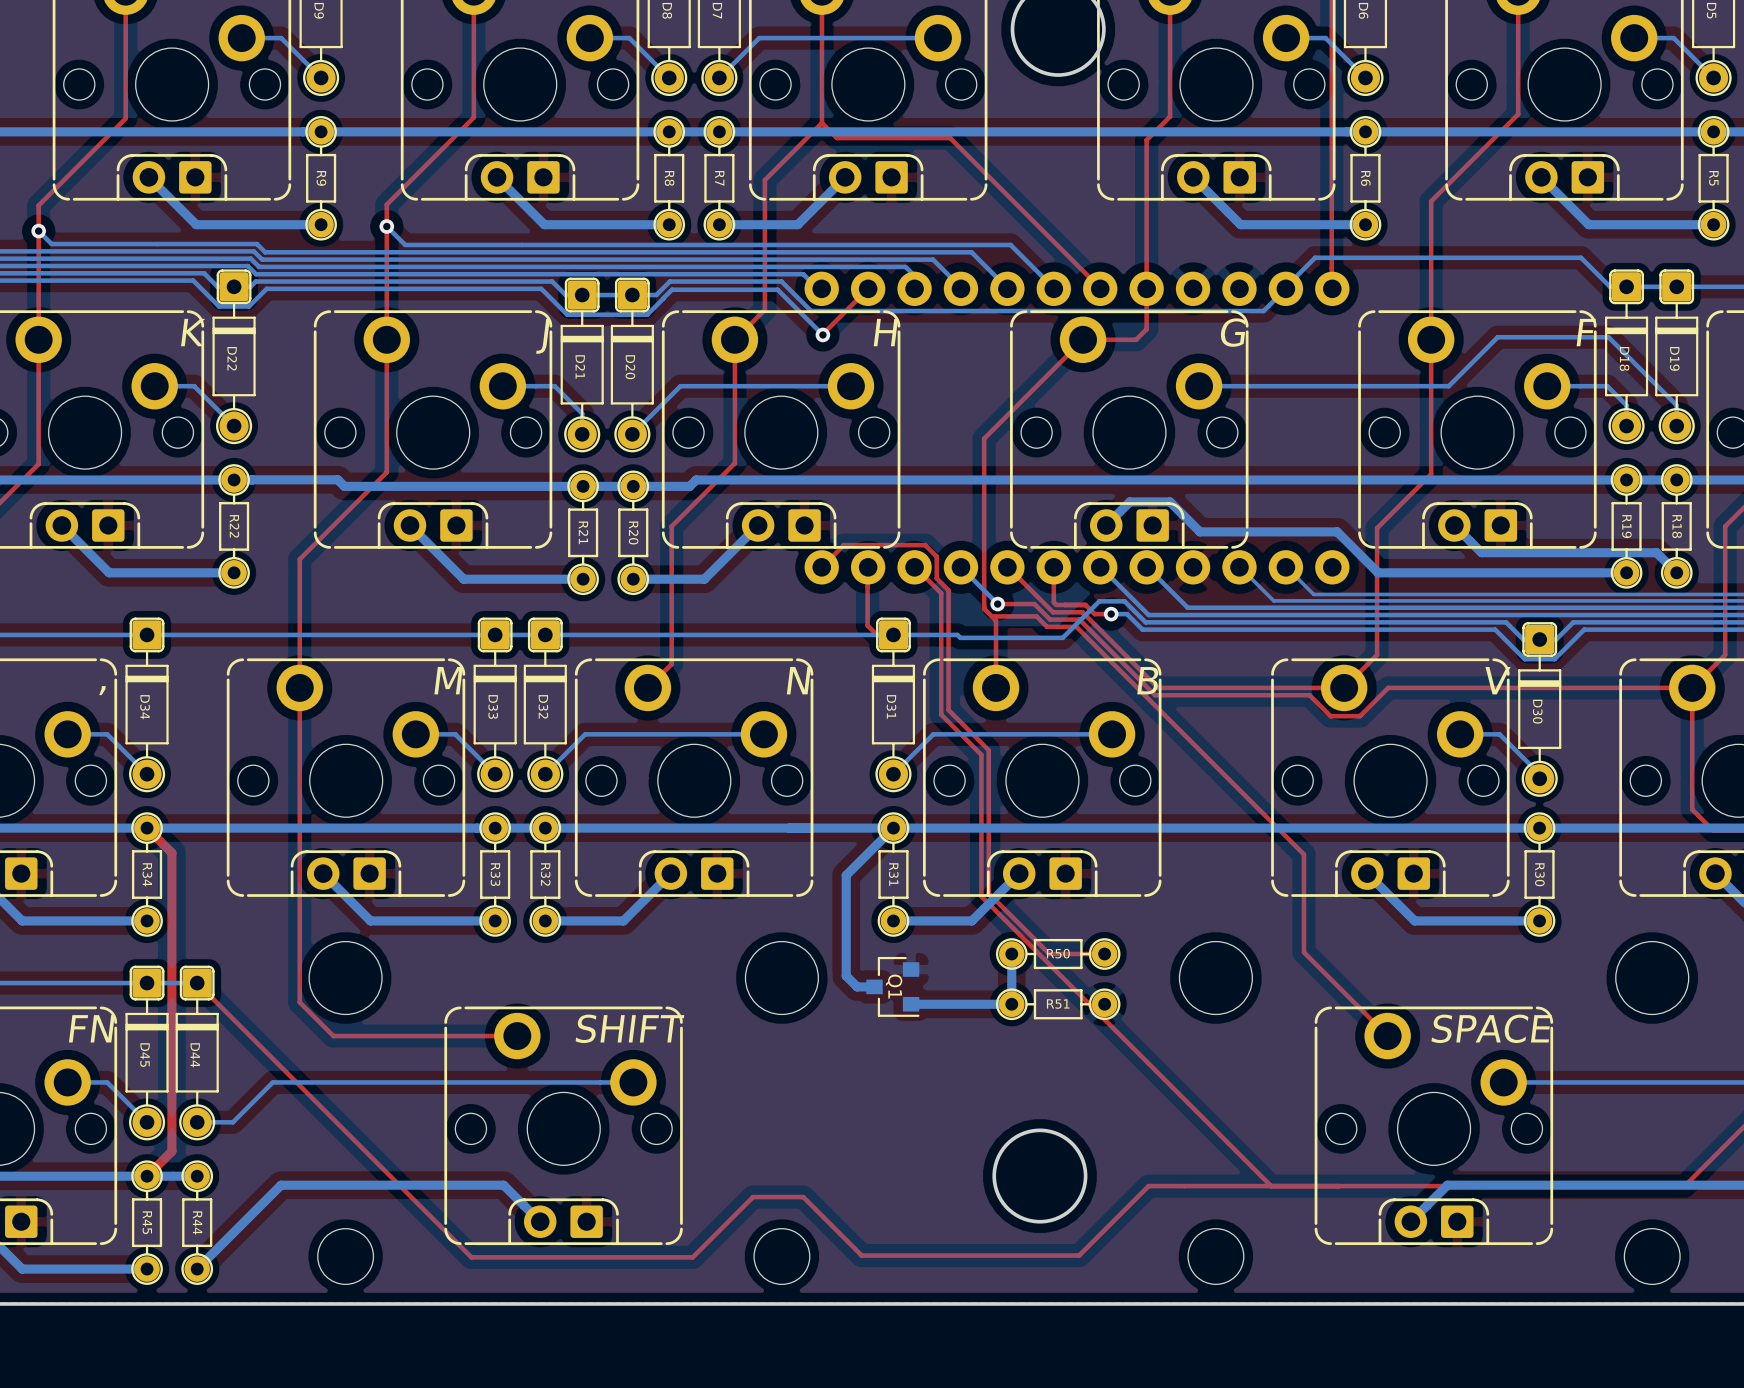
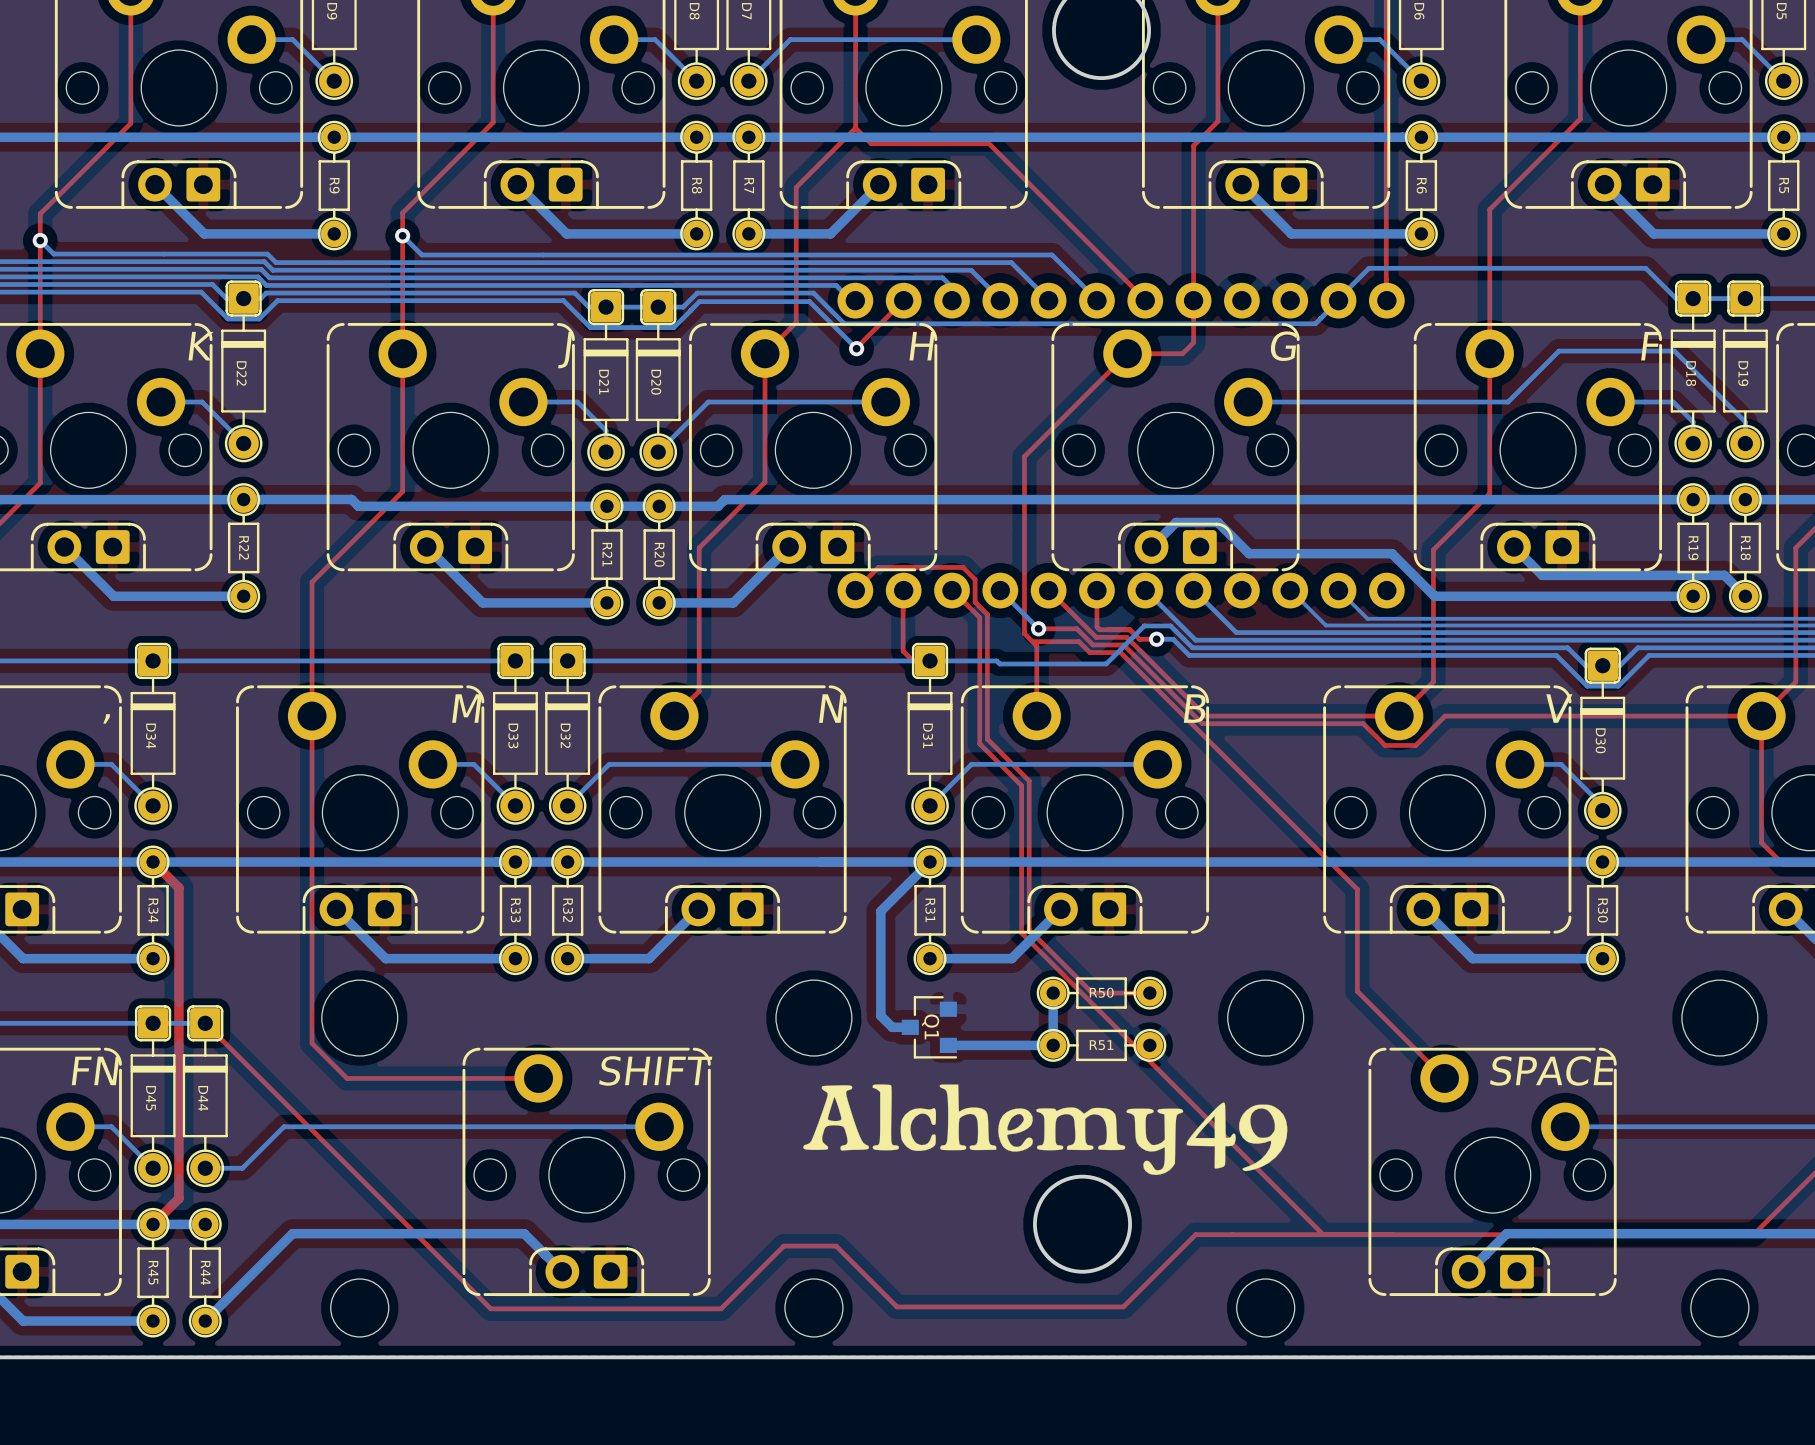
drawing: none -> [803, 1084, 1288, 1176]

